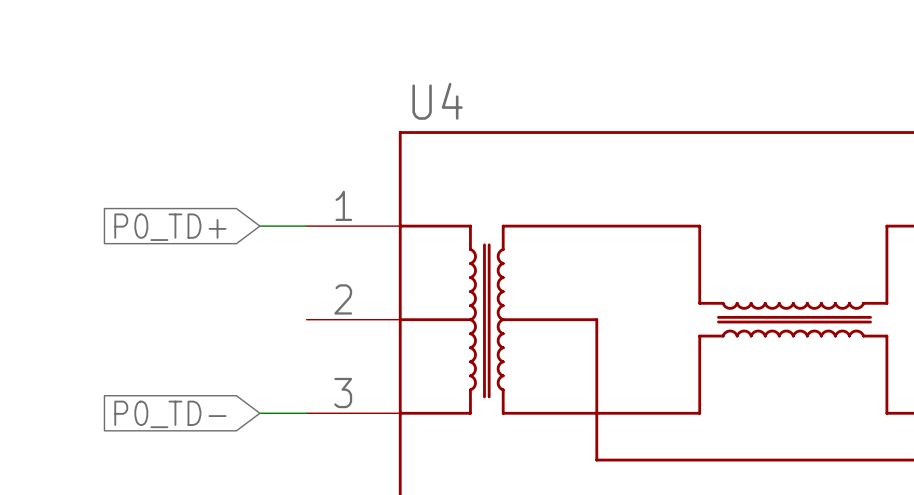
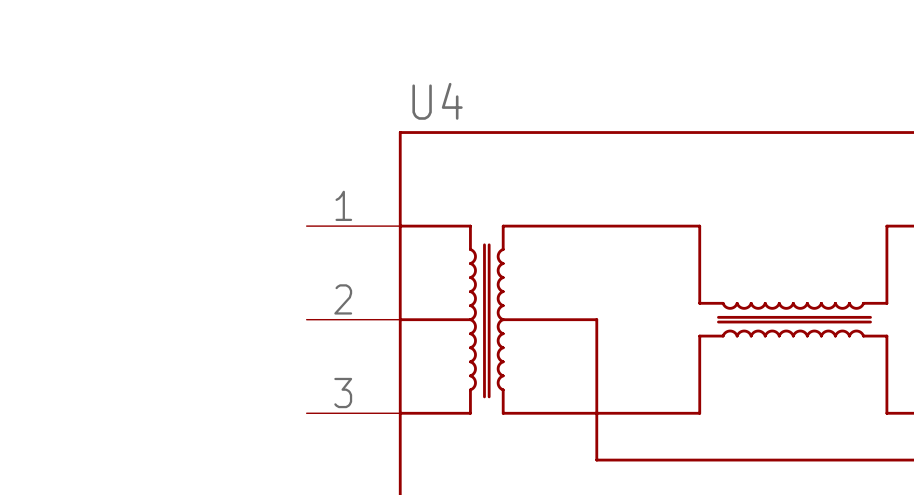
wire: (259, 226) (306, 226) -> none
global label: P0_TD+ (170, 227) -> none
wire: (259, 413) (306, 413) -> none
global label: P0_TD- (170, 414) -> none

